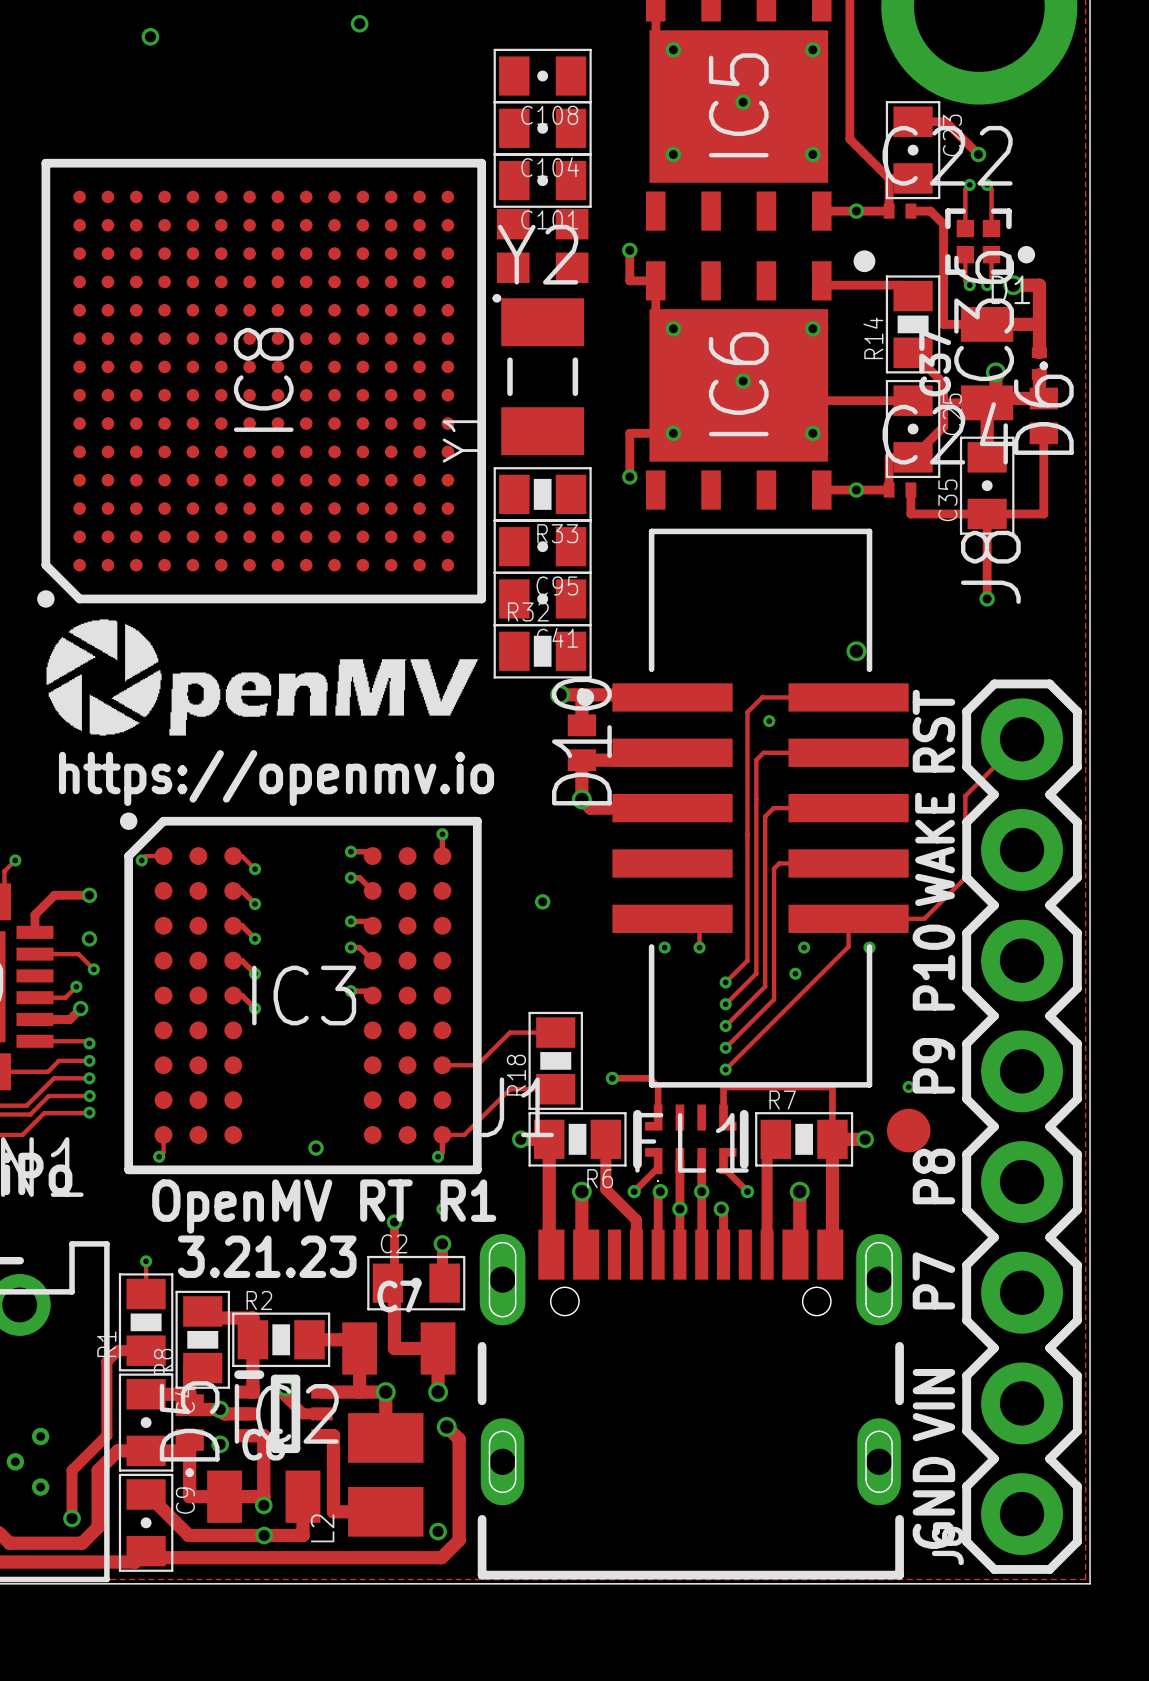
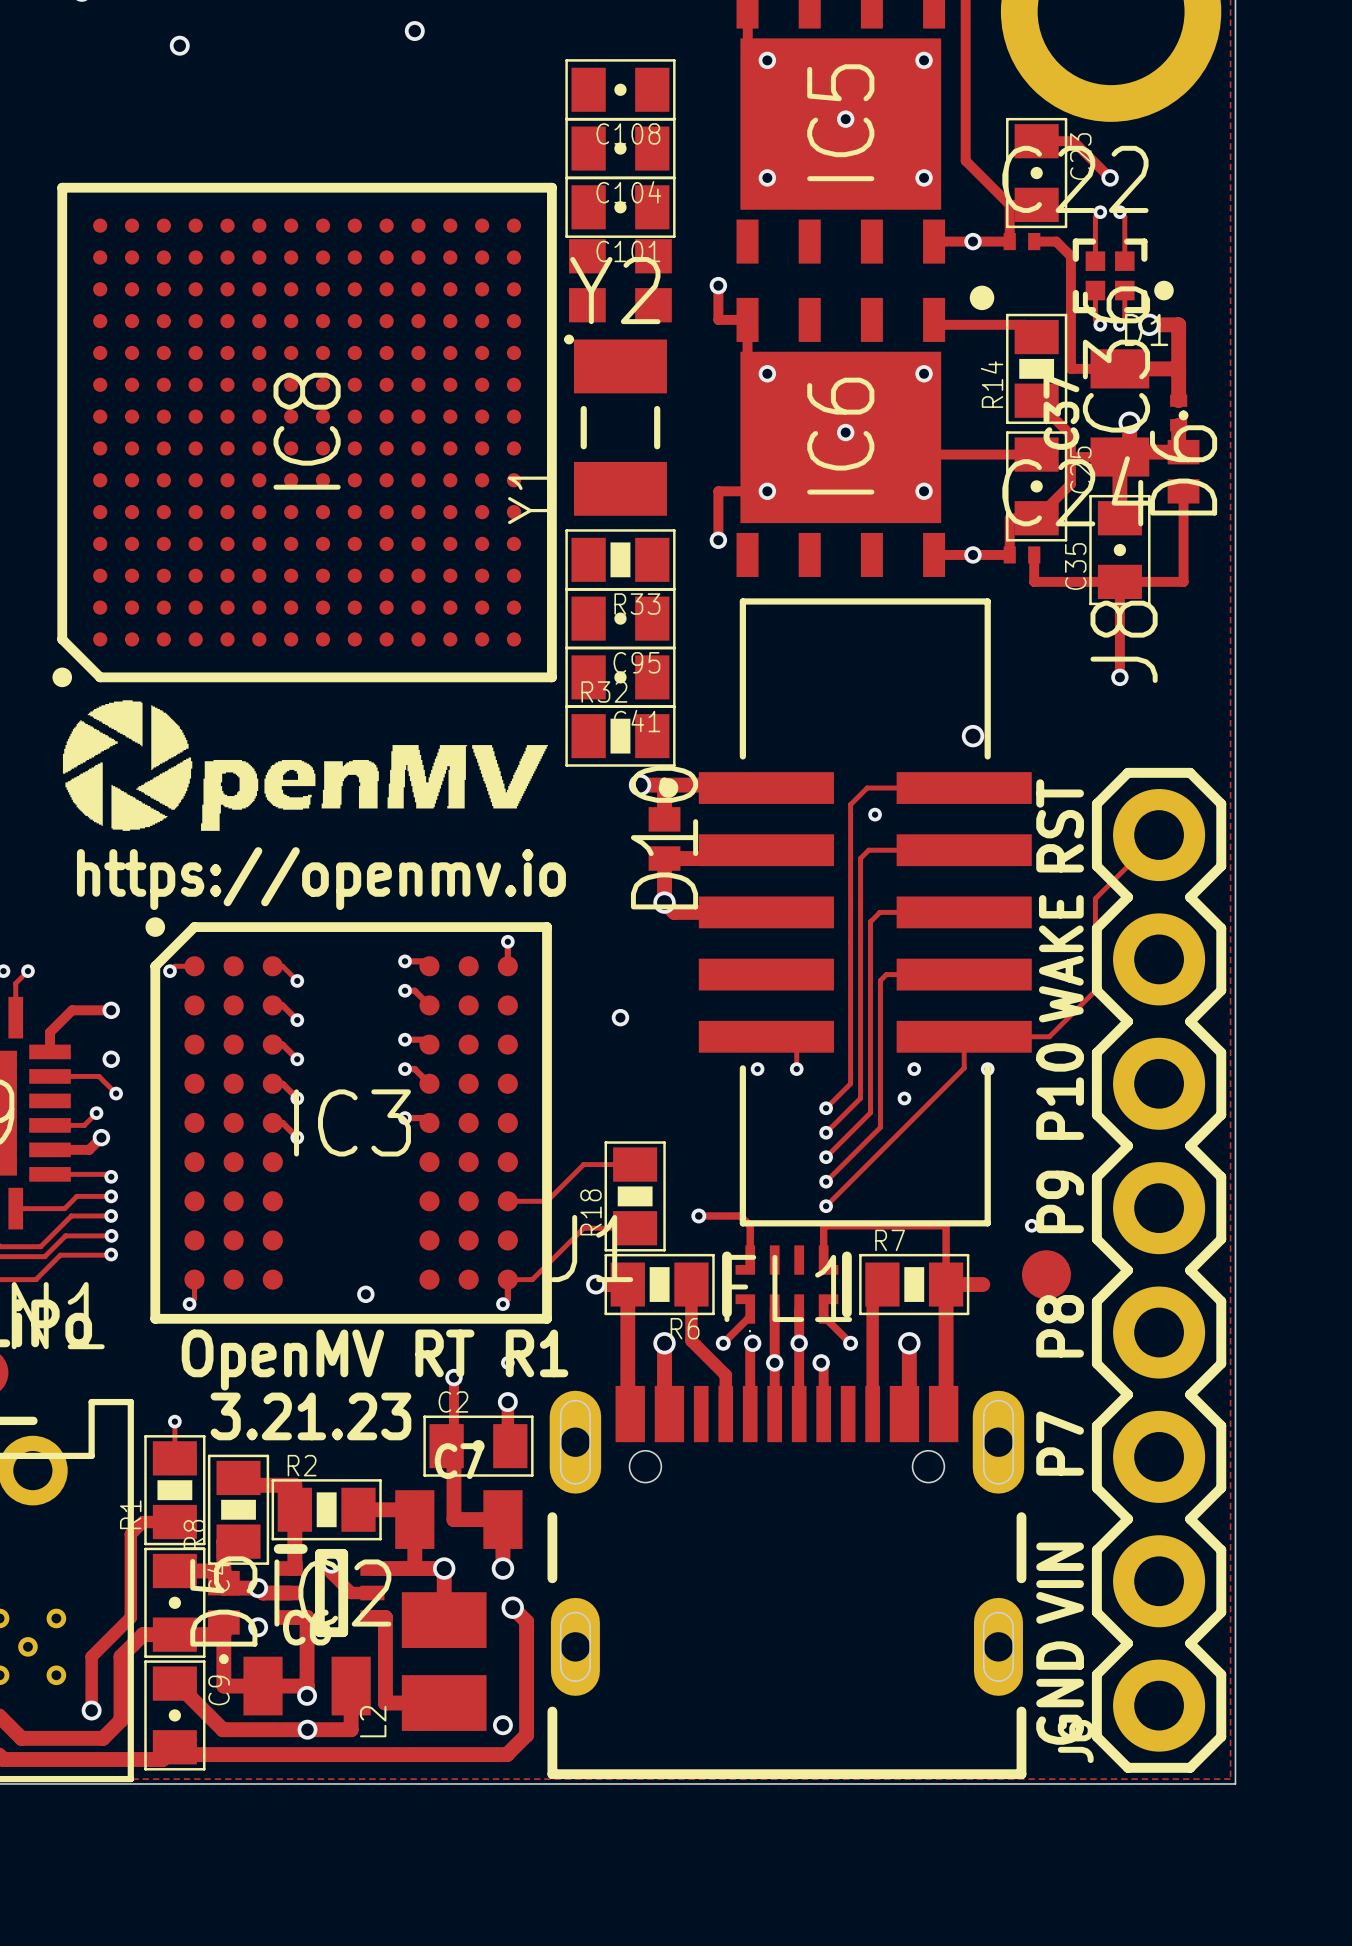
part position: (908, 1130) -> (1046, 1274)
via: (865, 1139) -> none

